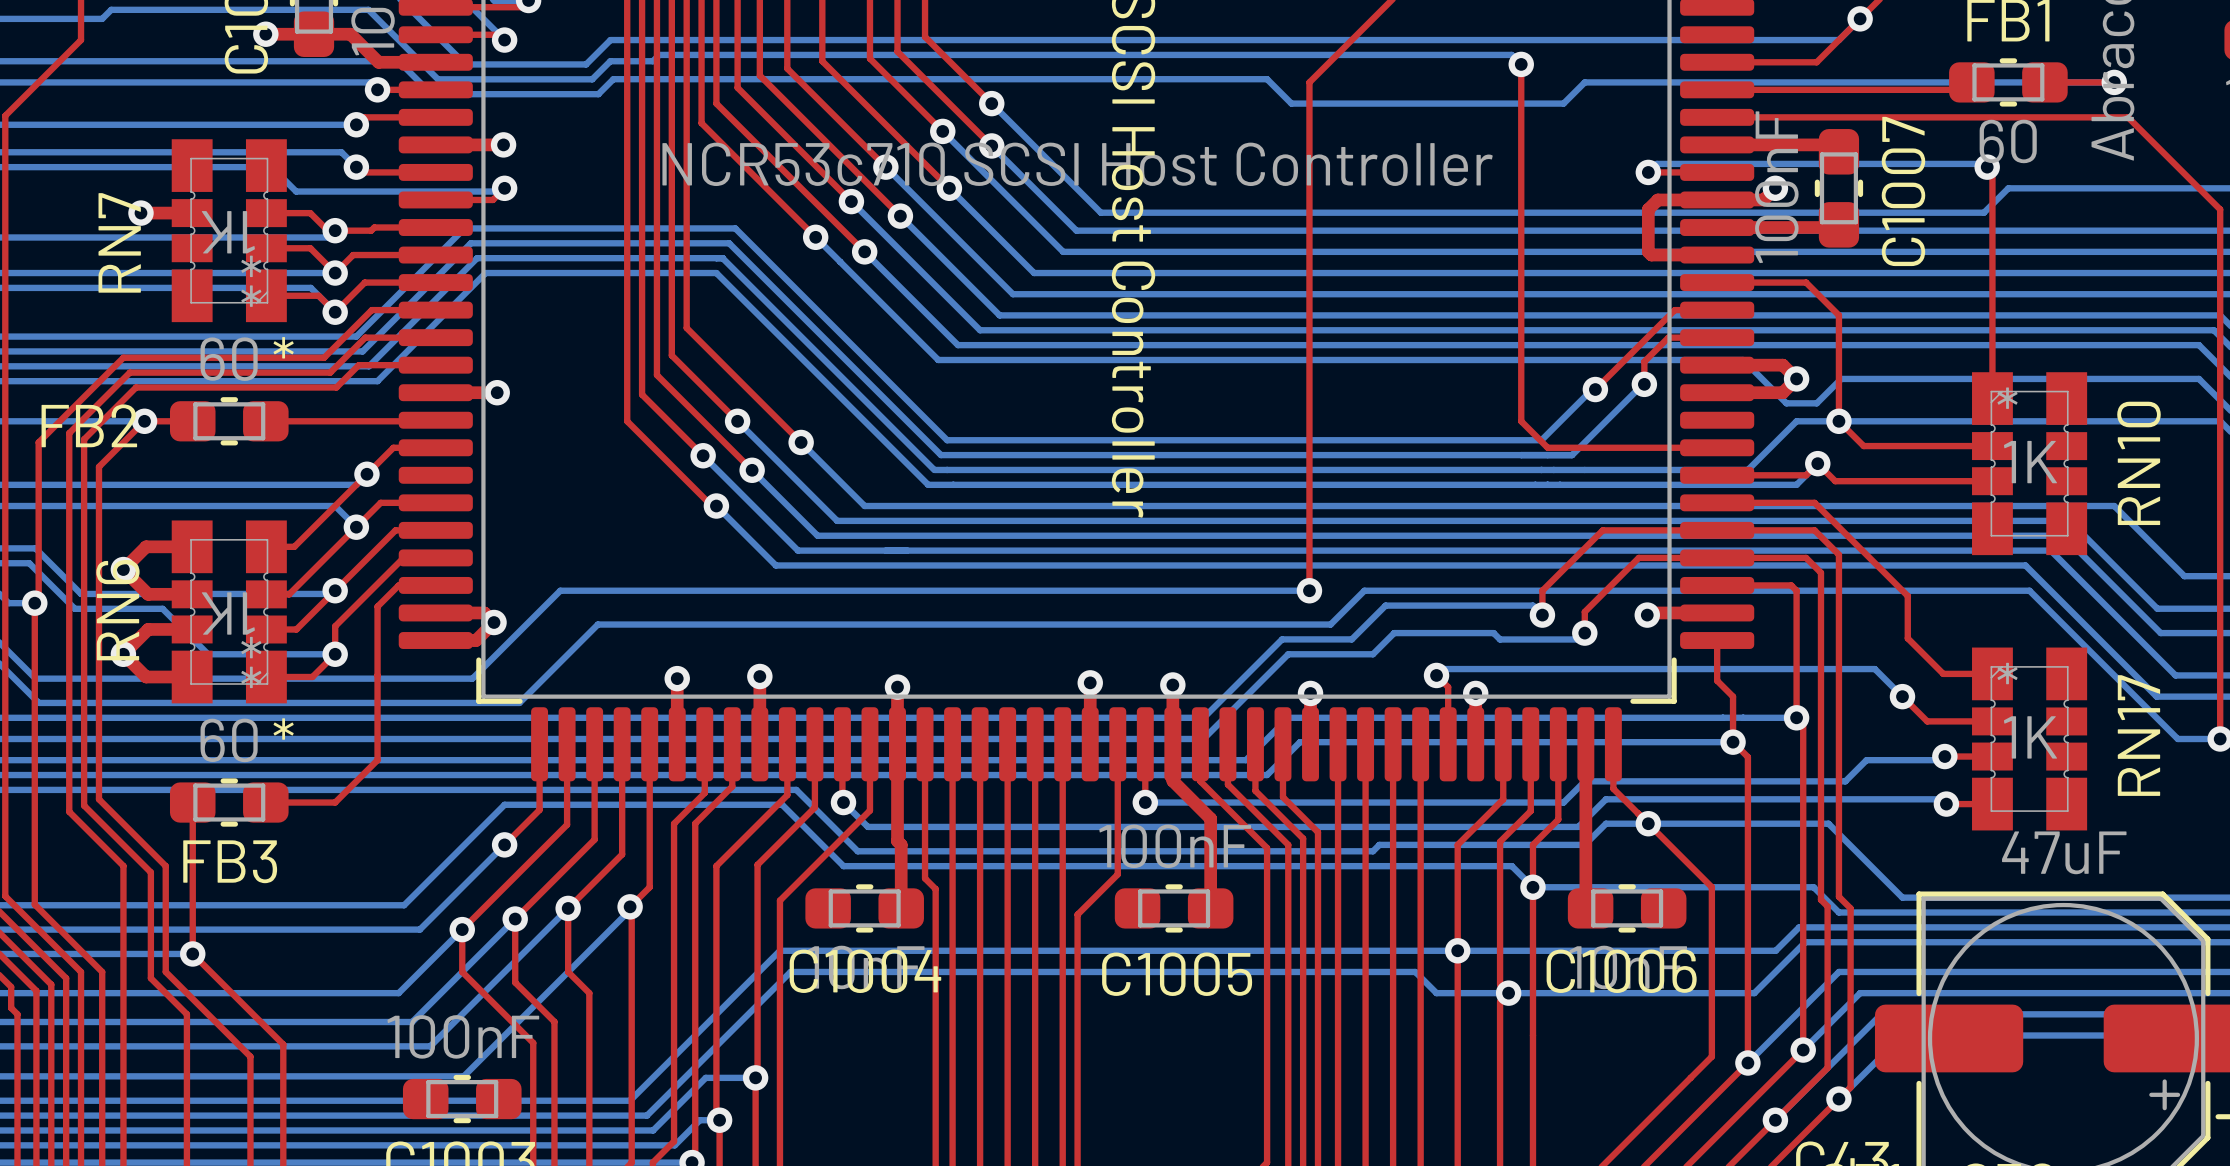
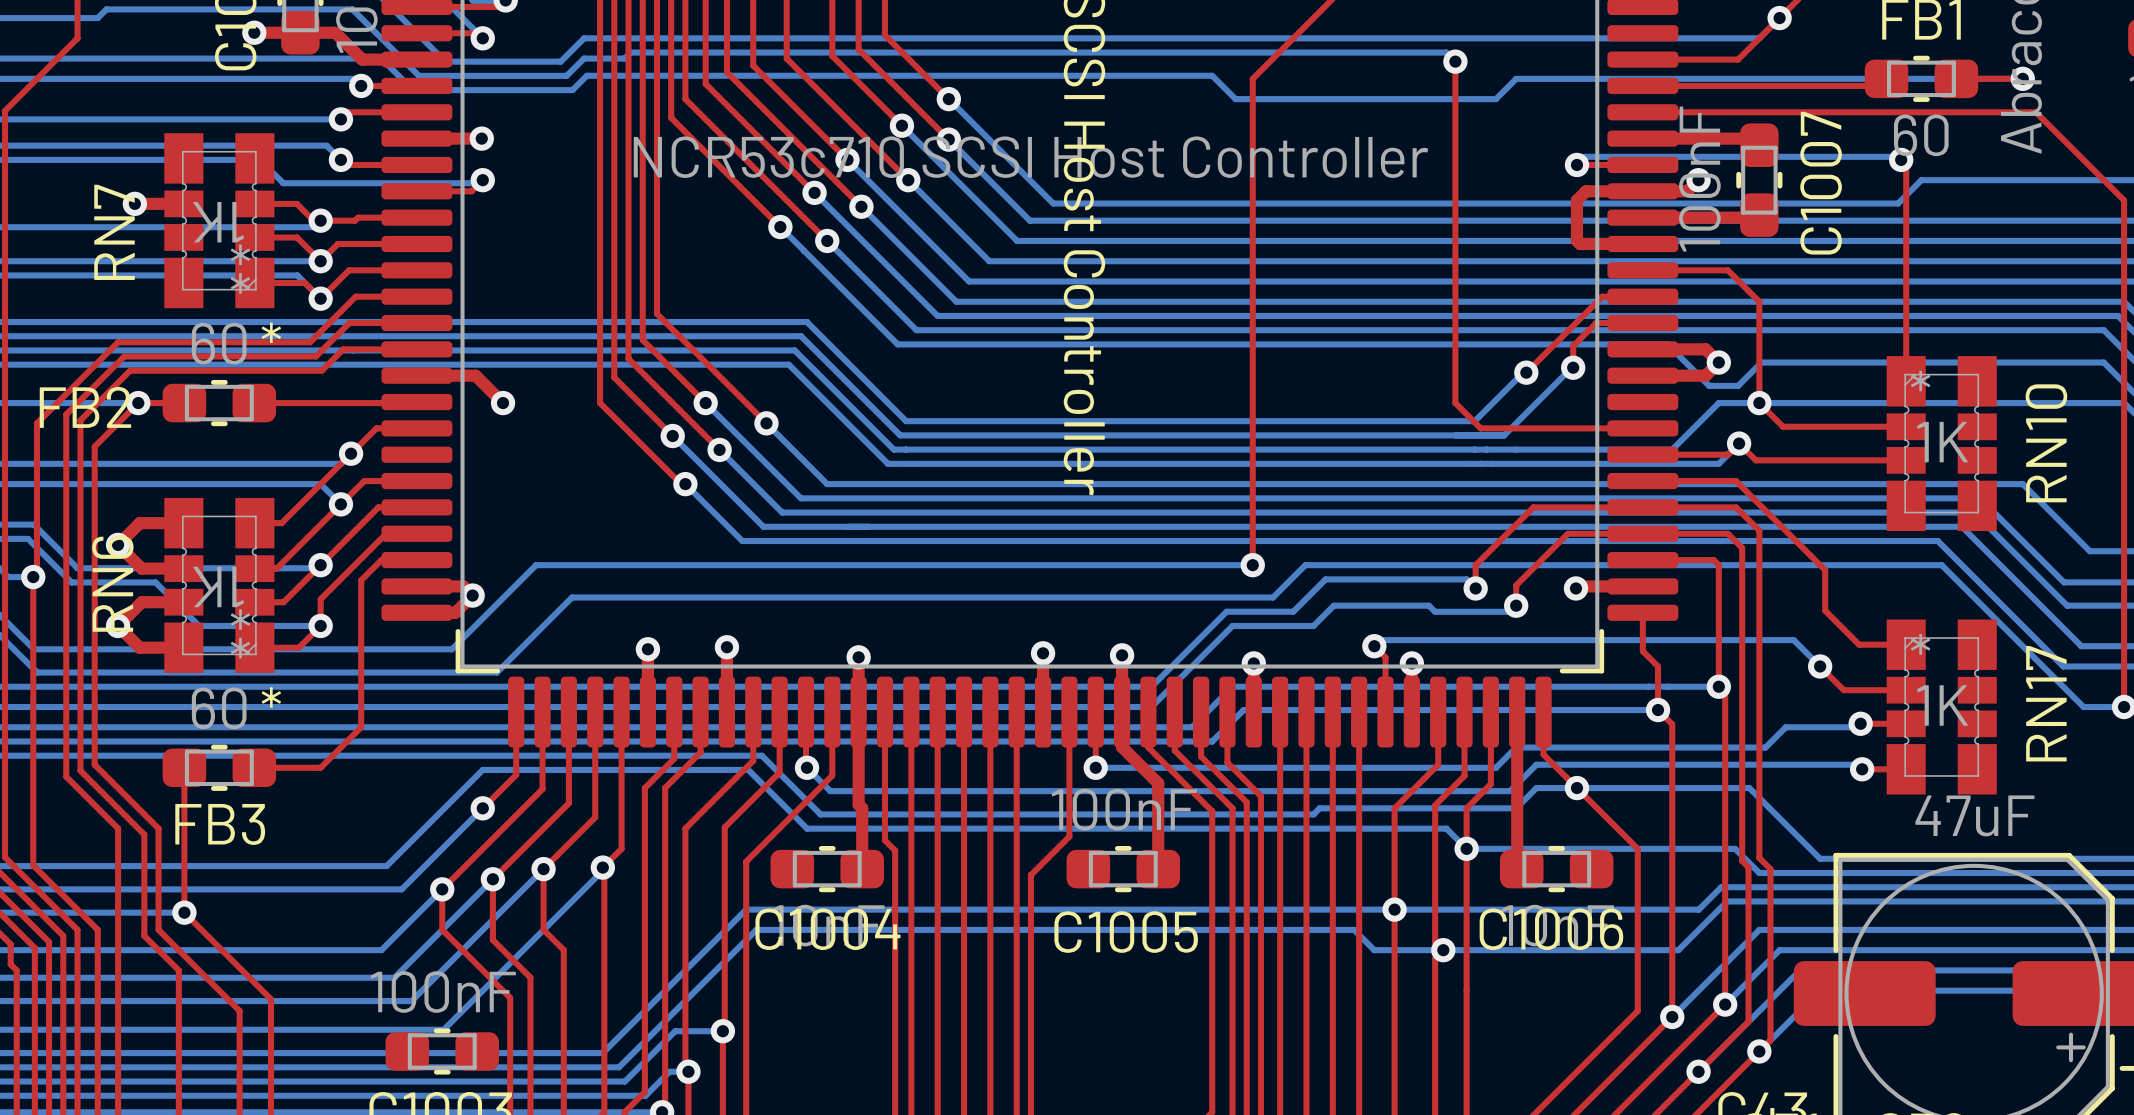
bottom track: (722, 258) (830, 366) -> none
bottom track: (723, 258) (477, 258) (368, 366) -> (794, 350) (353, 350)
bottom track: (356, 336) (464, 228) (735, 228) (843, 336) -> (340, 322) (806, 322)
bottom track: (362, 351) (470, 243) (729, 243) (837, 351) -> (346, 336) (801, 336)
bottom track: (377, 381) (485, 273) (716, 273) (824, 381) -> (361, 364) (788, 364)
top track: none -> (475, 375) (503, 403)
via position: (497, 392) -> (503, 403)

